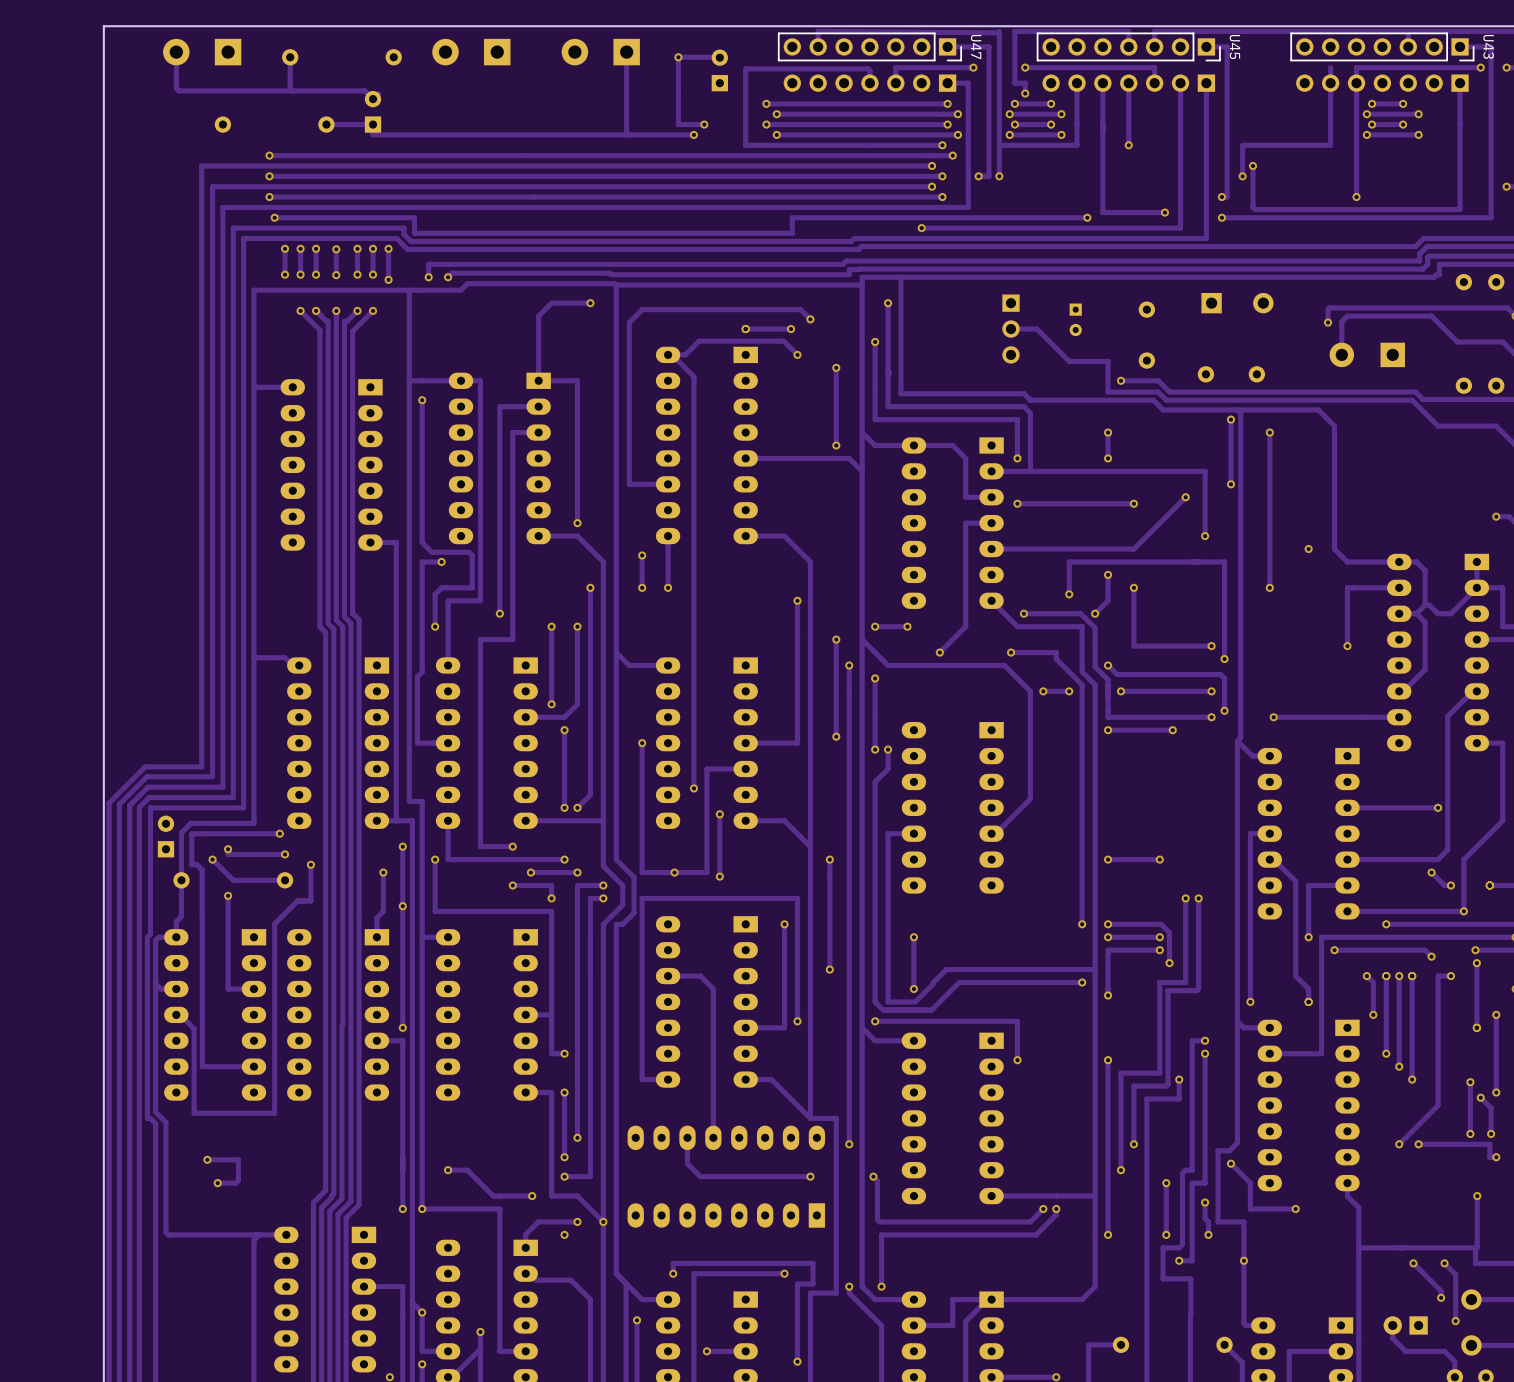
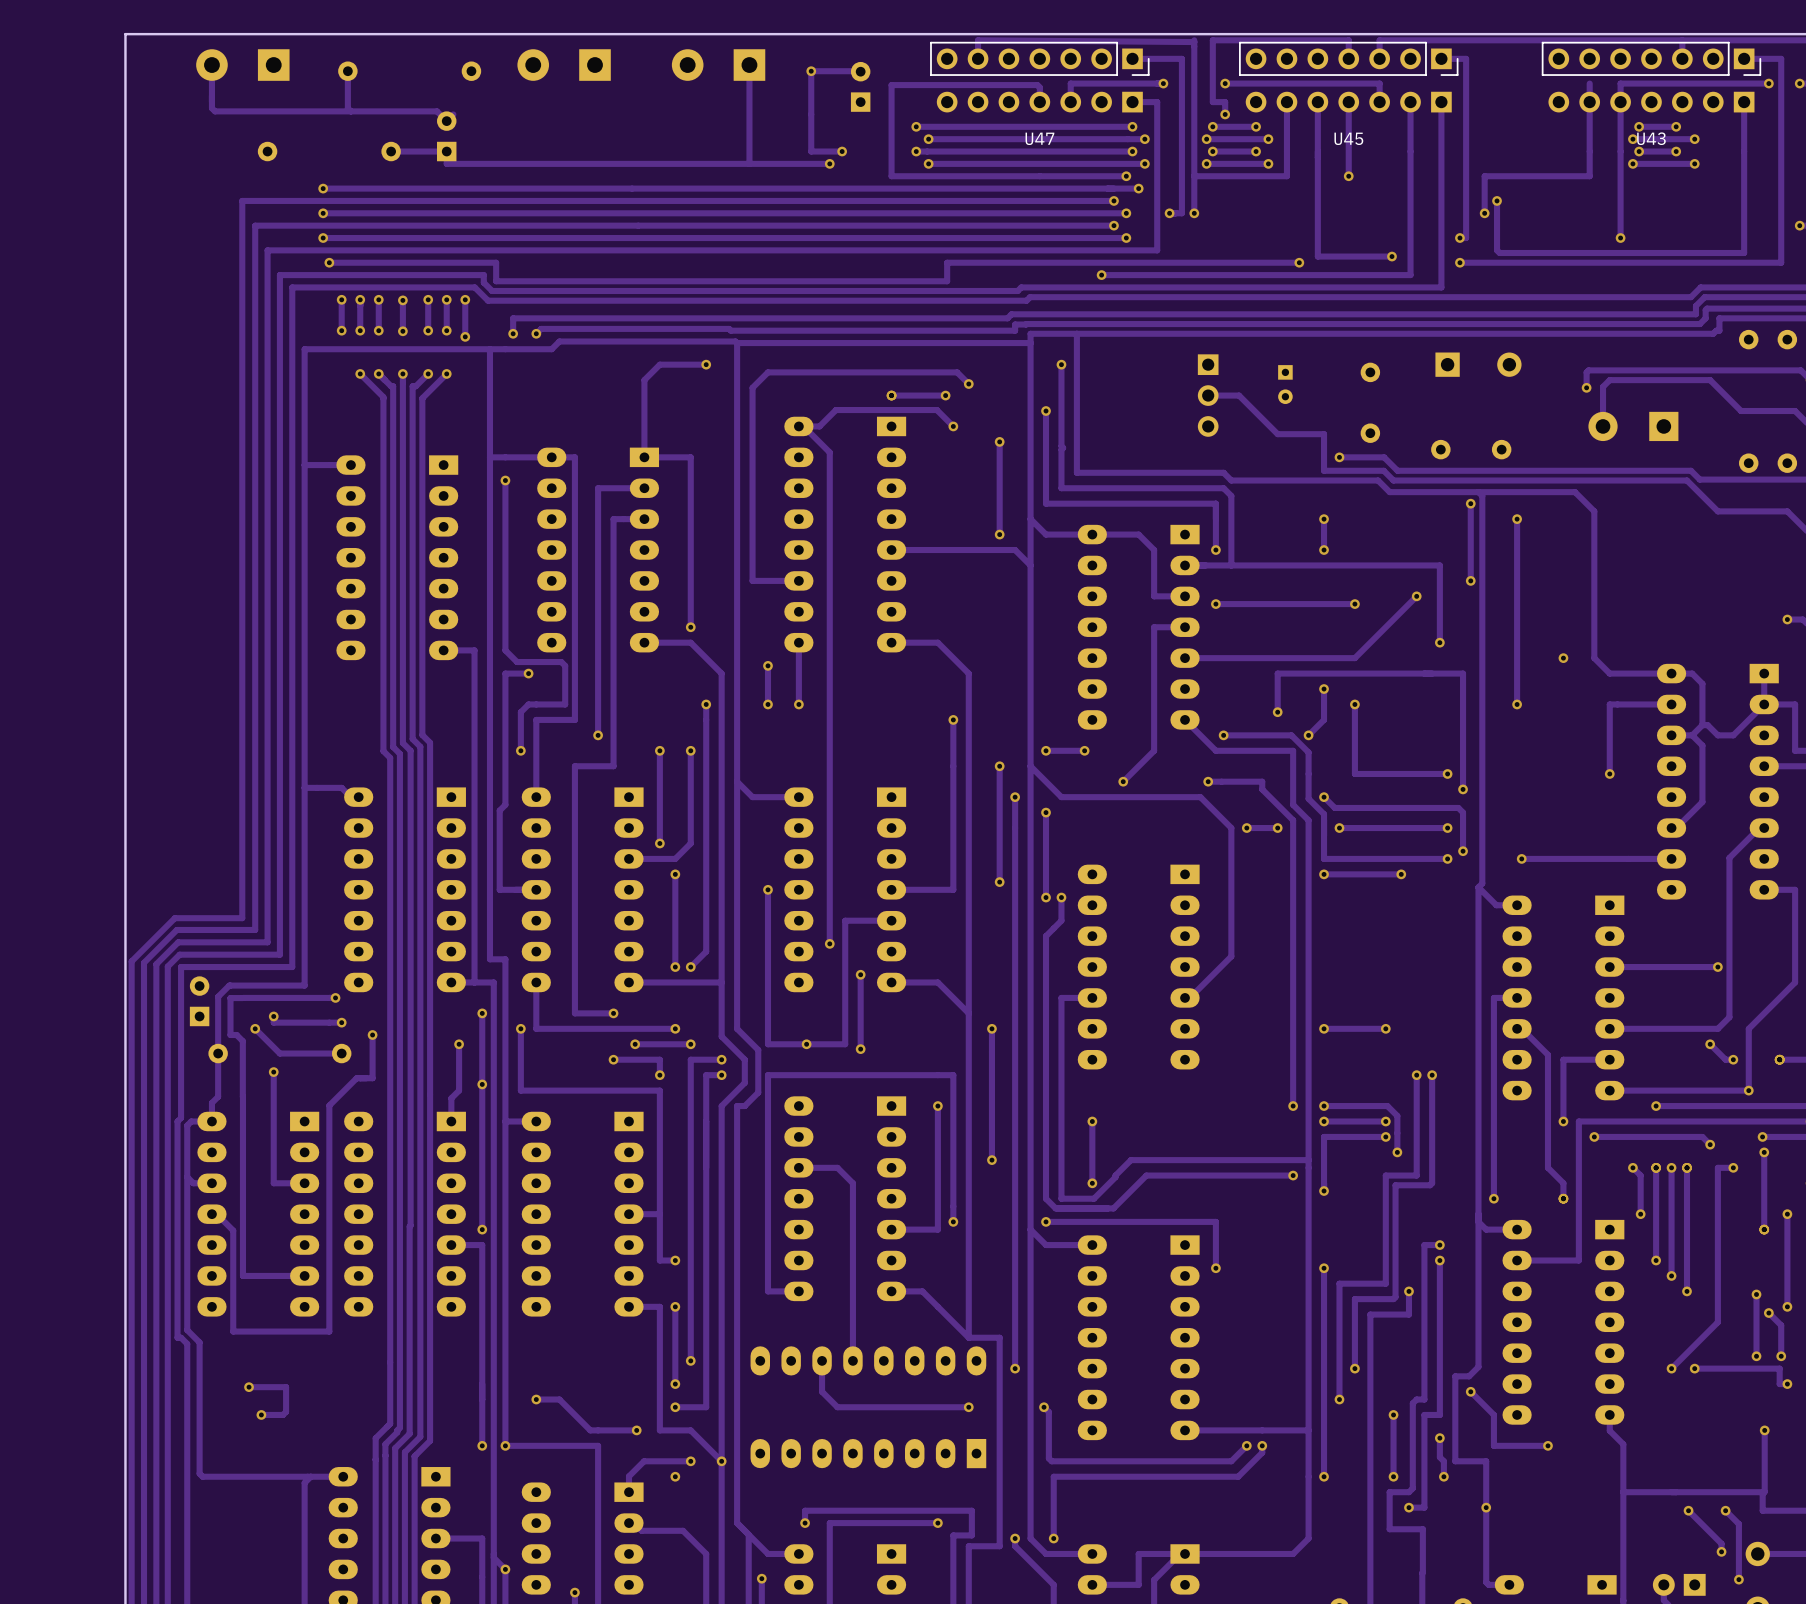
U43 name rotation: 0° (1488, 46) -> 90° counterclockwise (1651, 138)
U43 name position: U43 (1488, 46) -> U43 (1651, 138)
U47 name rotation: 0° (976, 47) -> 90° counterclockwise (1039, 138)
U47 name position: U47 (976, 47) -> U47 (1039, 138)
U45 name rotation: 0° (1234, 47) -> 90° counterclockwise (1348, 138)
U45 name position: U45 (1234, 47) -> U45 (1348, 138)

